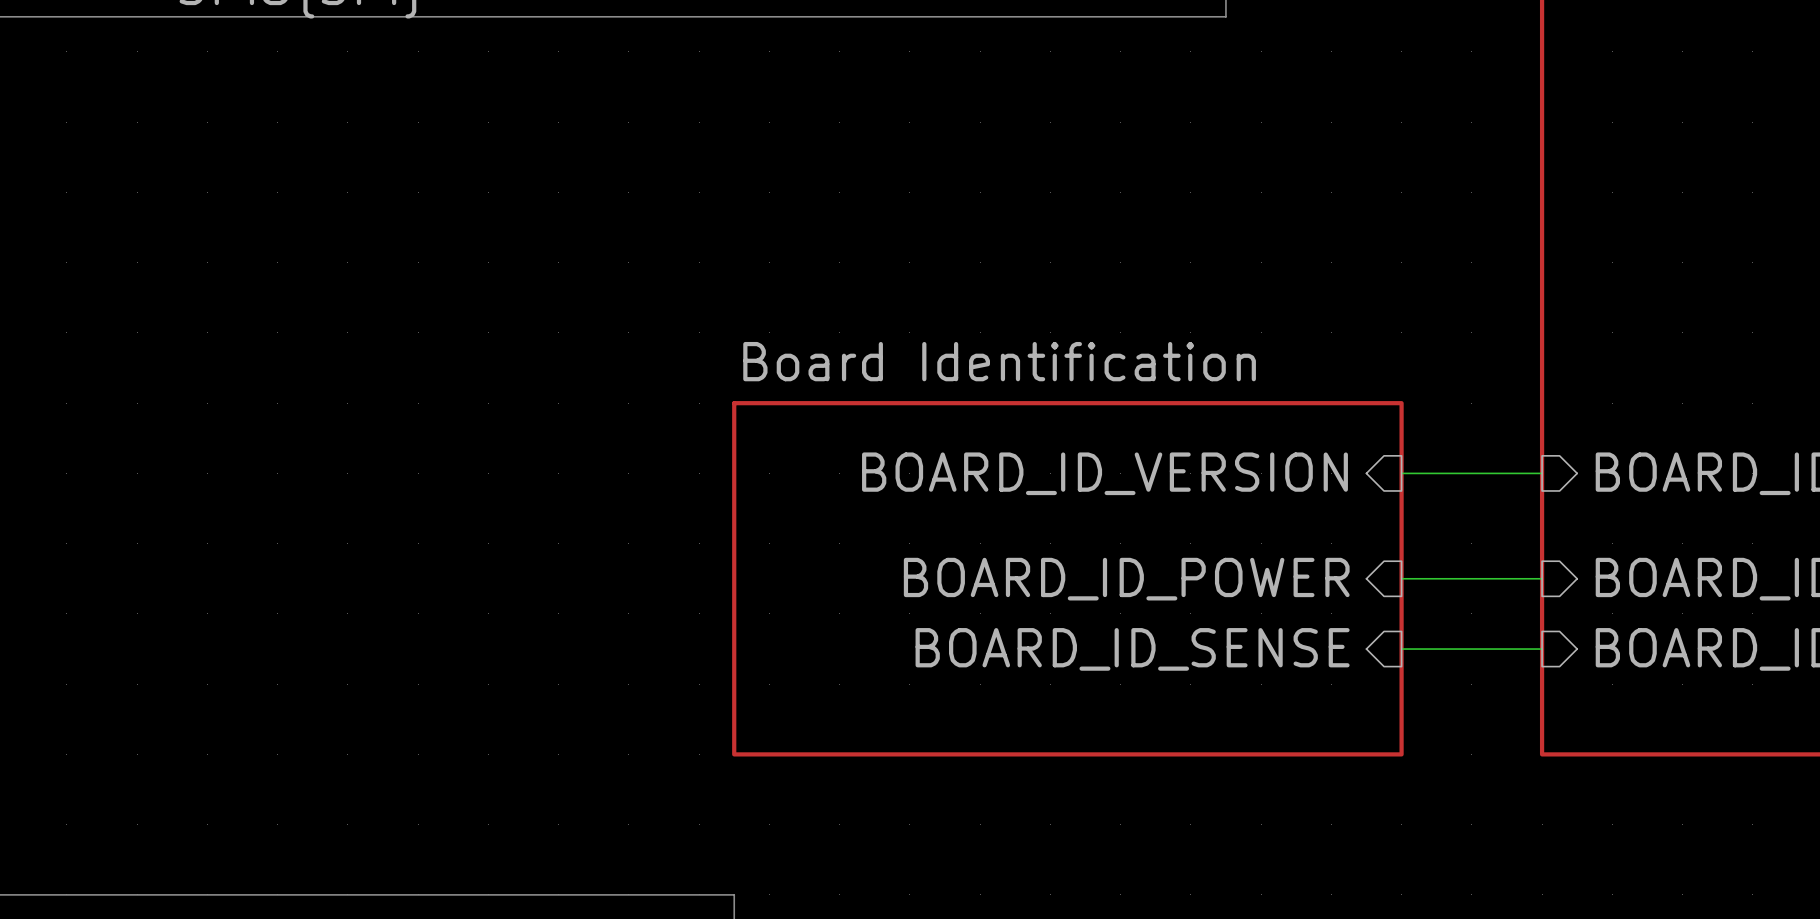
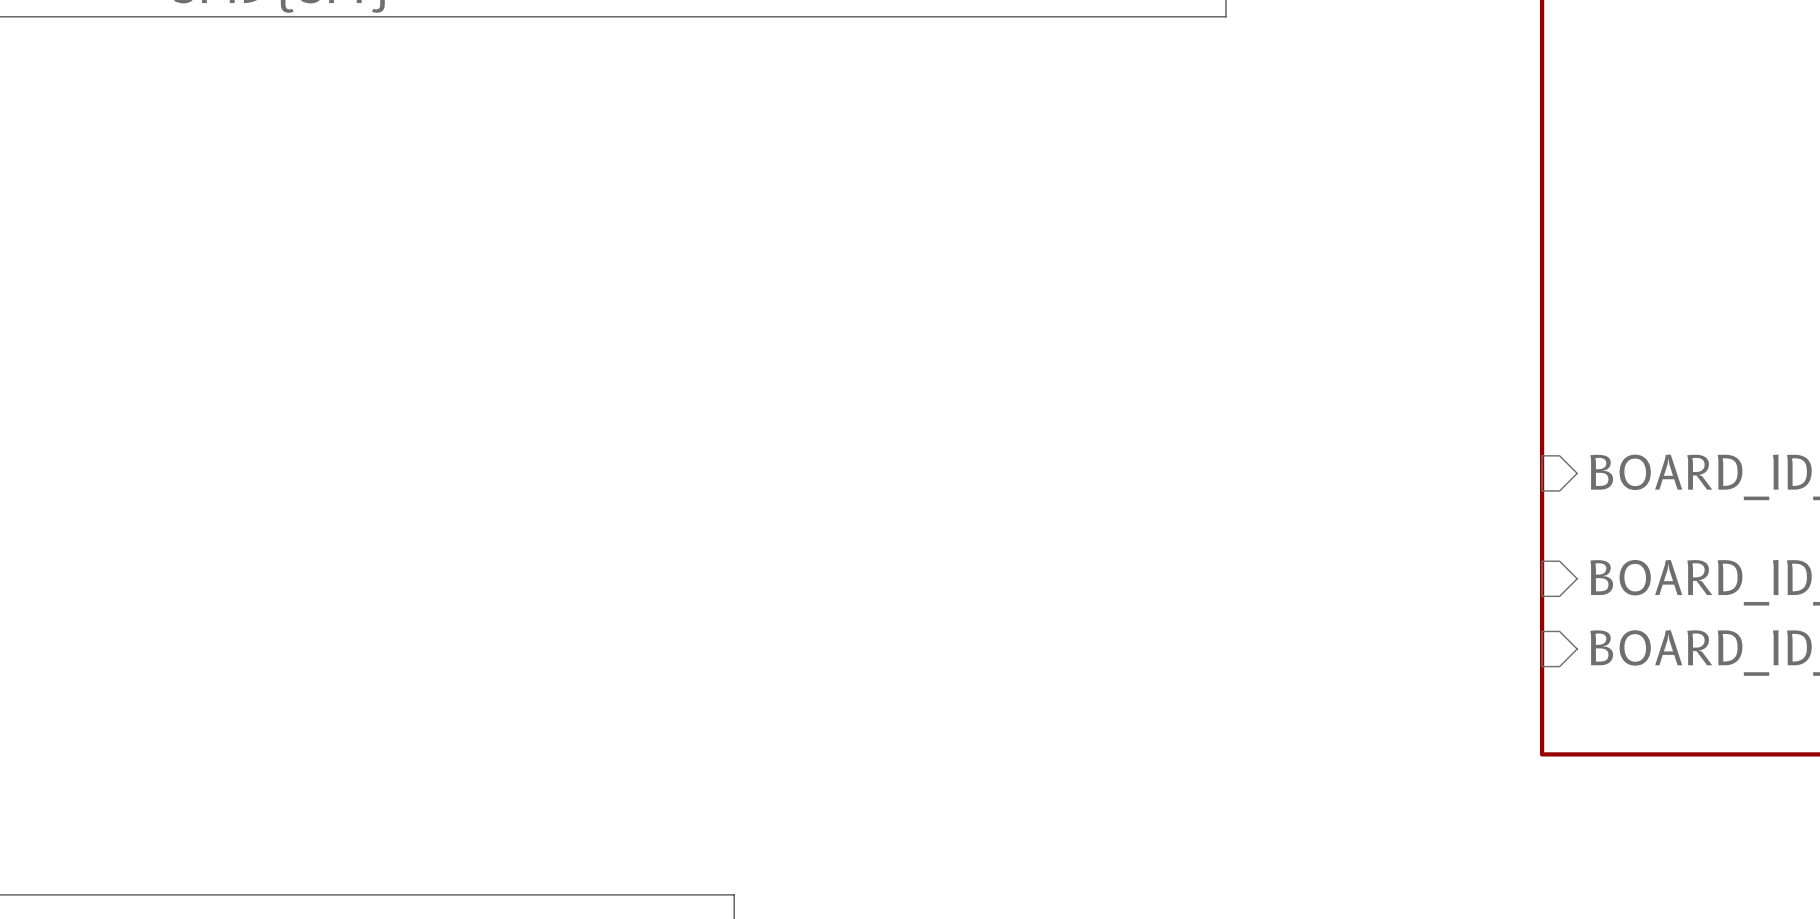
sheet pin: BOARD_ID_VERSION (1104, 473) -> none
wire: (1401, 473) (1542, 473) -> none
sheet Board Identification: (1067, 578) -> none
wire: (1401, 578) (1542, 578) -> none
sheet pin: BOARD_ID_POWER (1126, 579) -> none
sheet pin: BOARD_ID_SENSE (1132, 649) -> none
wire: (1401, 649) (1542, 649) -> none

